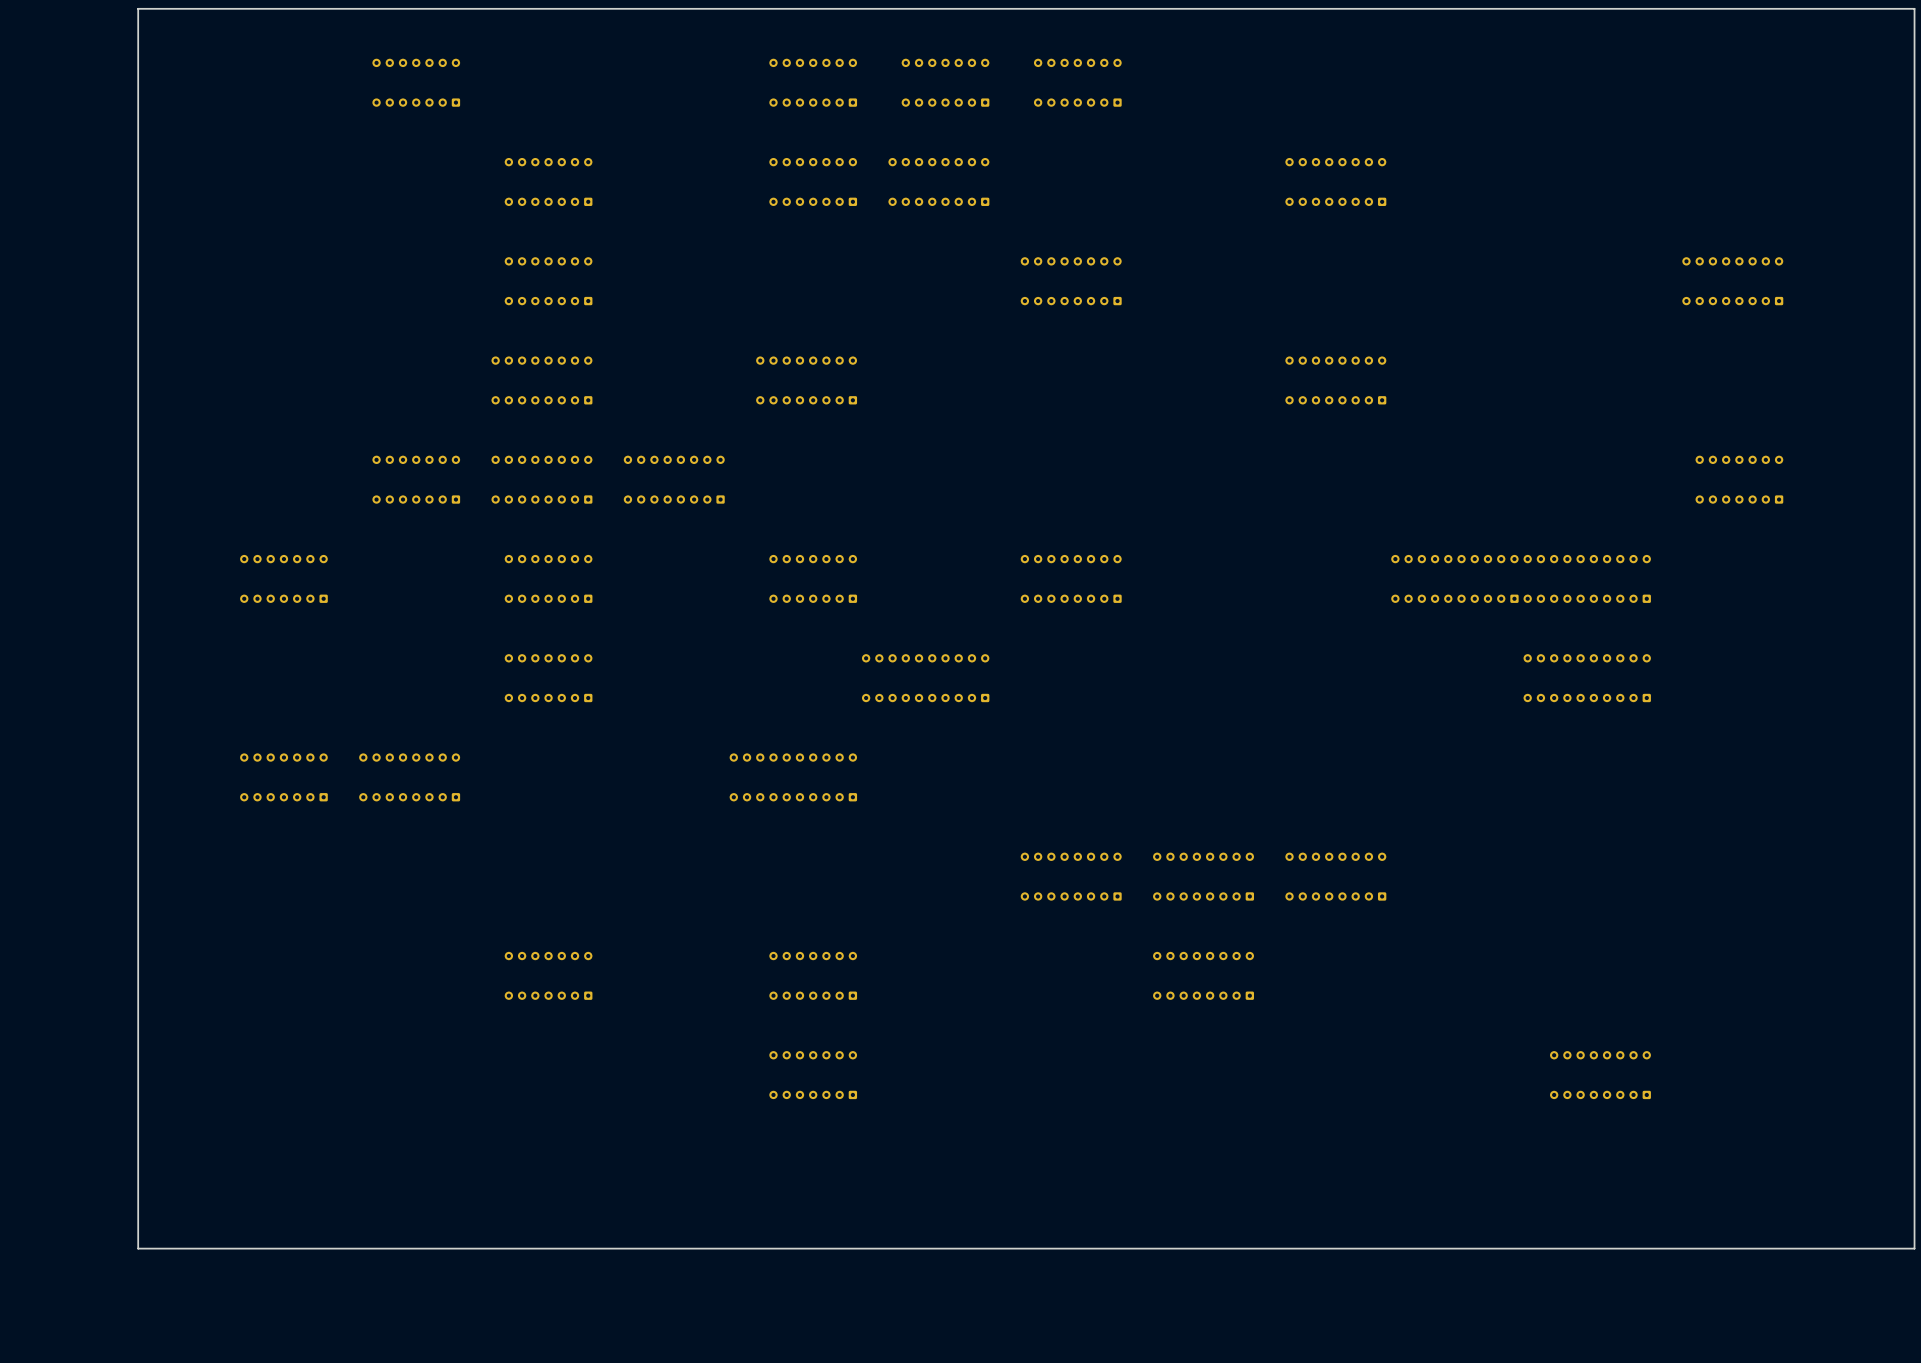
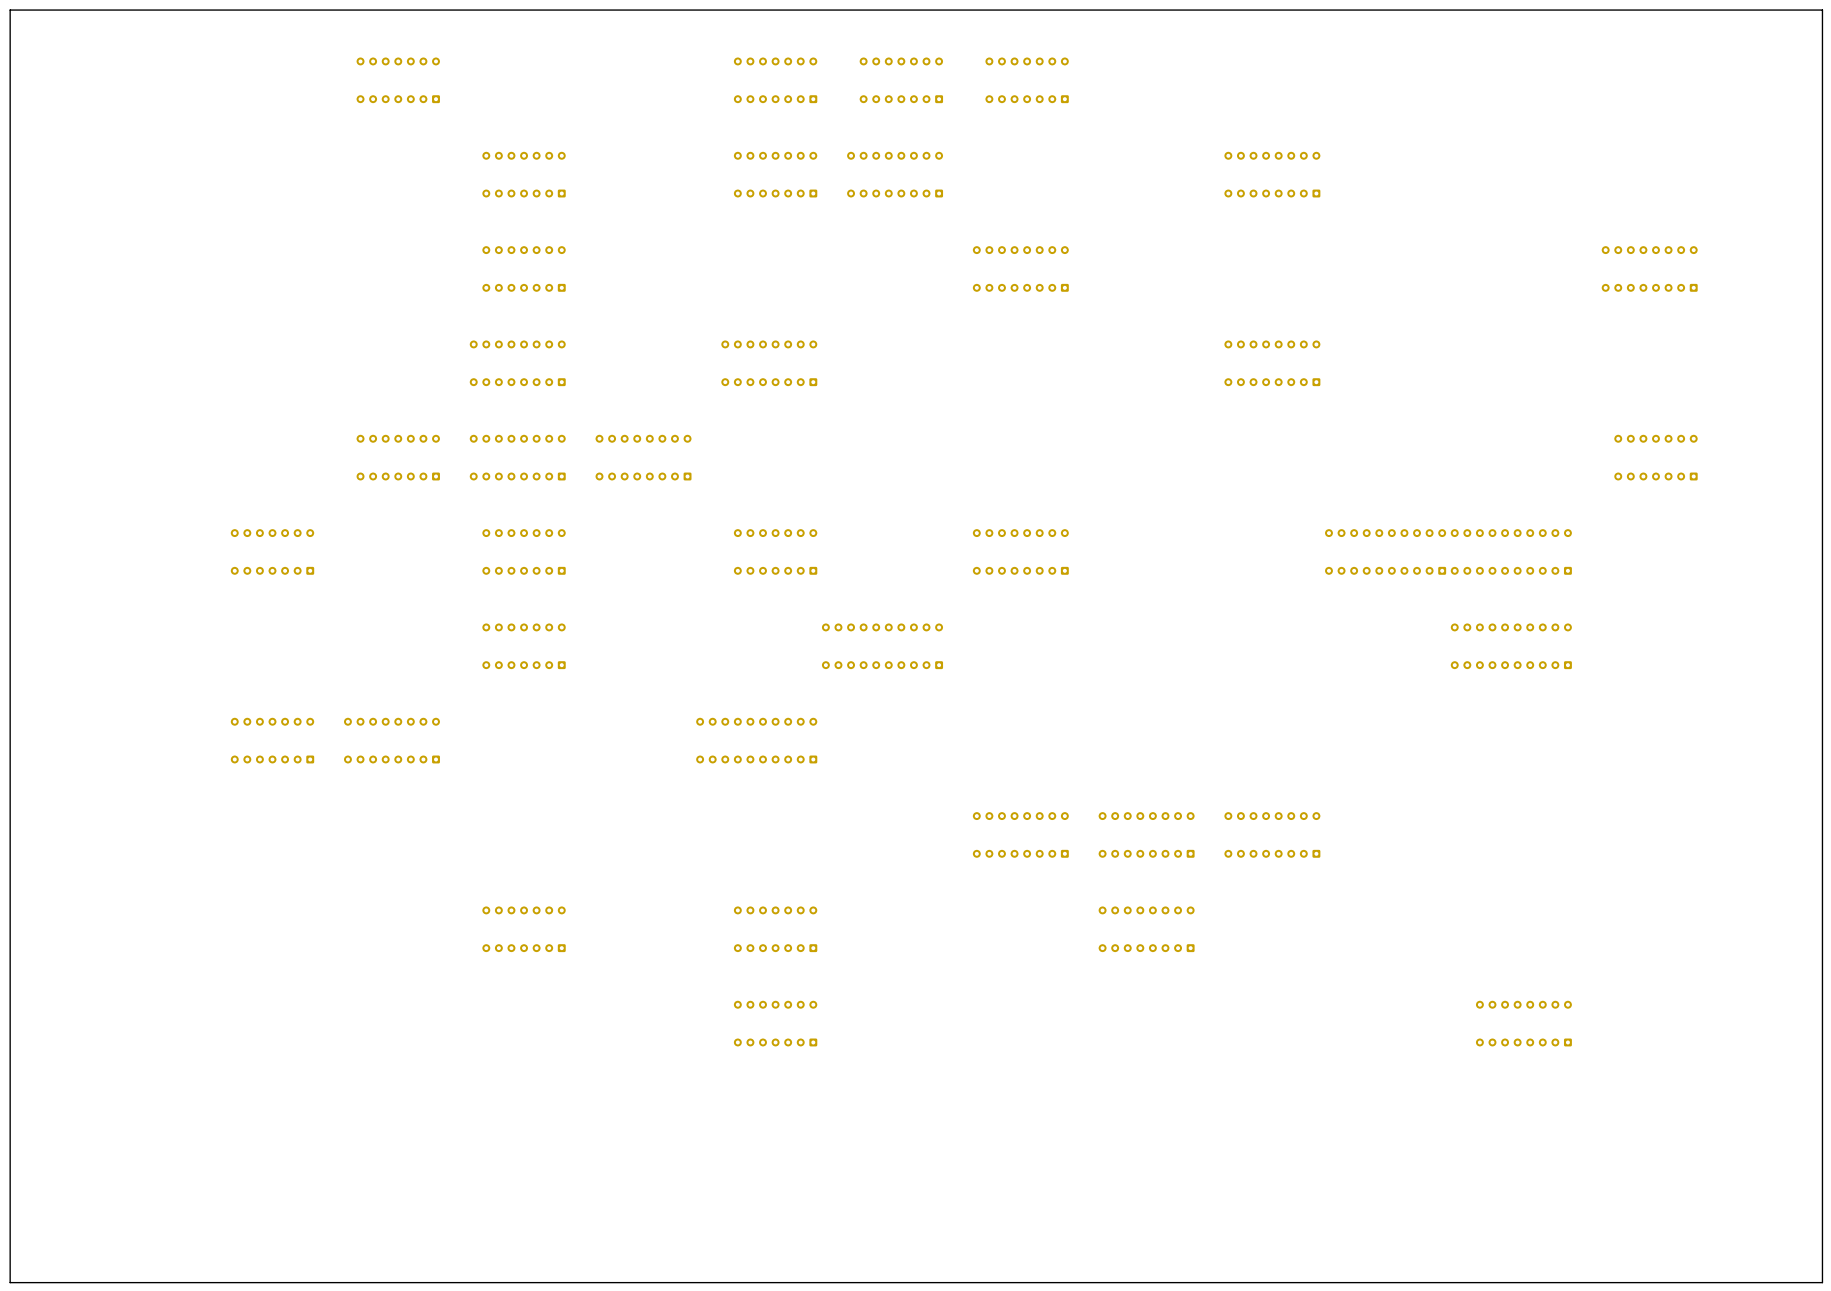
board edge: (138, 8) (138, 1248) (1914, 1248) -> (133, 10) (10, 10) (10, 1282) (1822, 1282) (1822, 1188)

